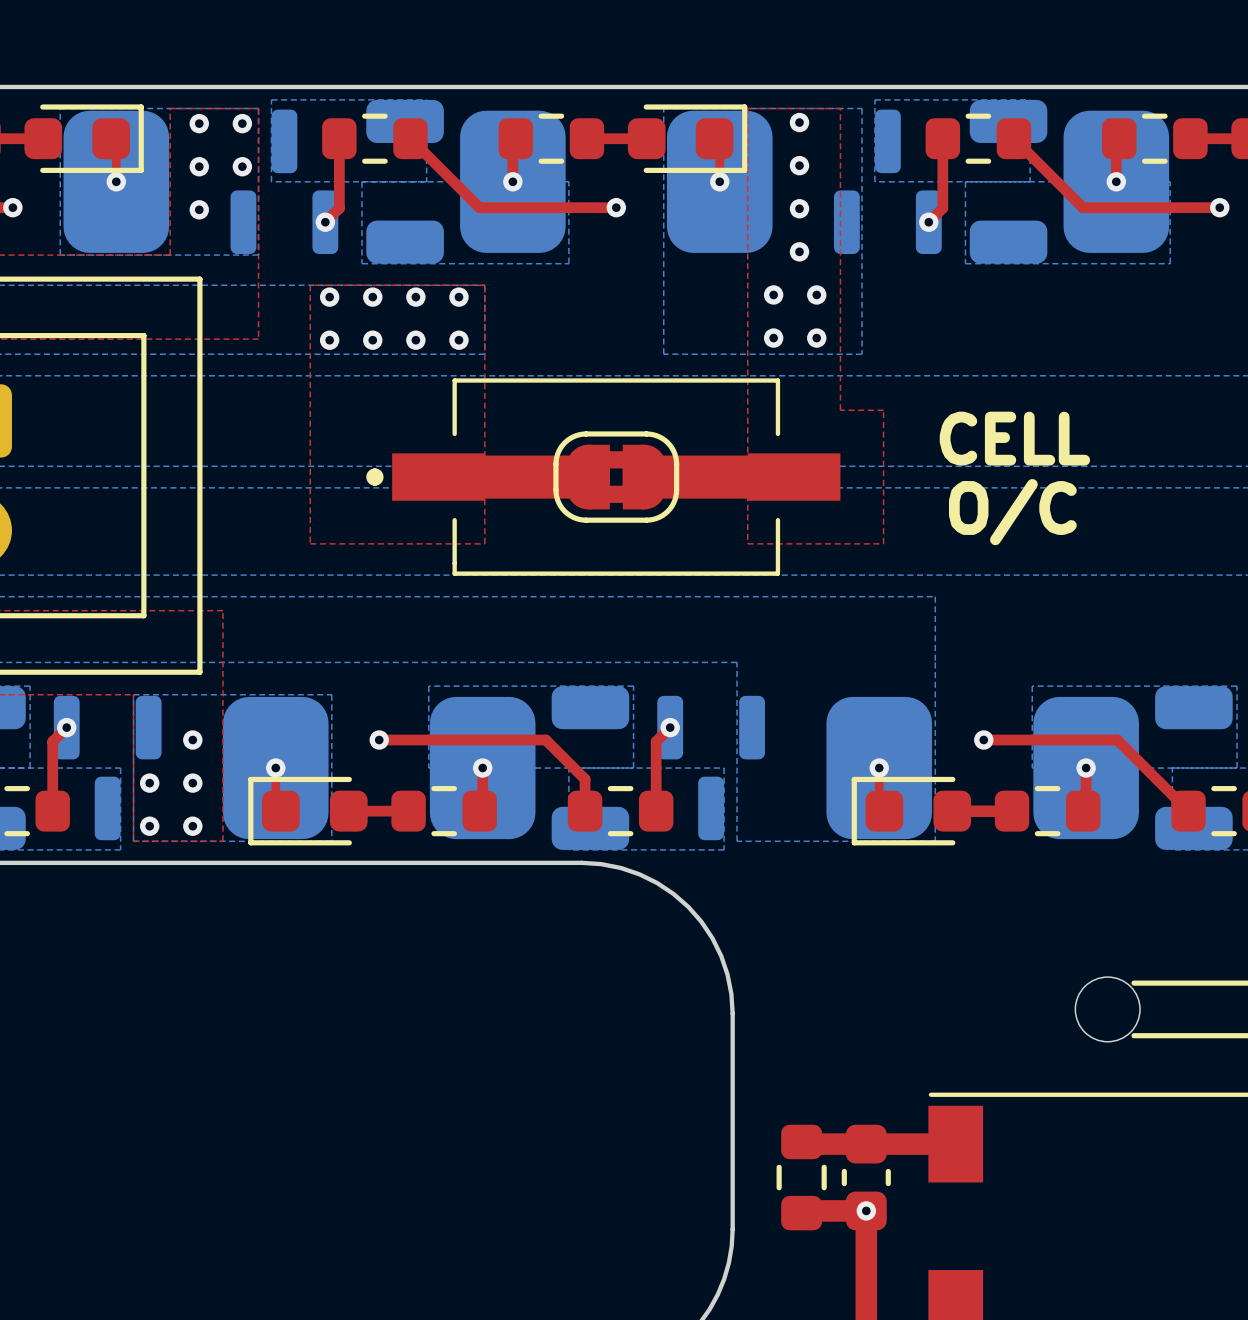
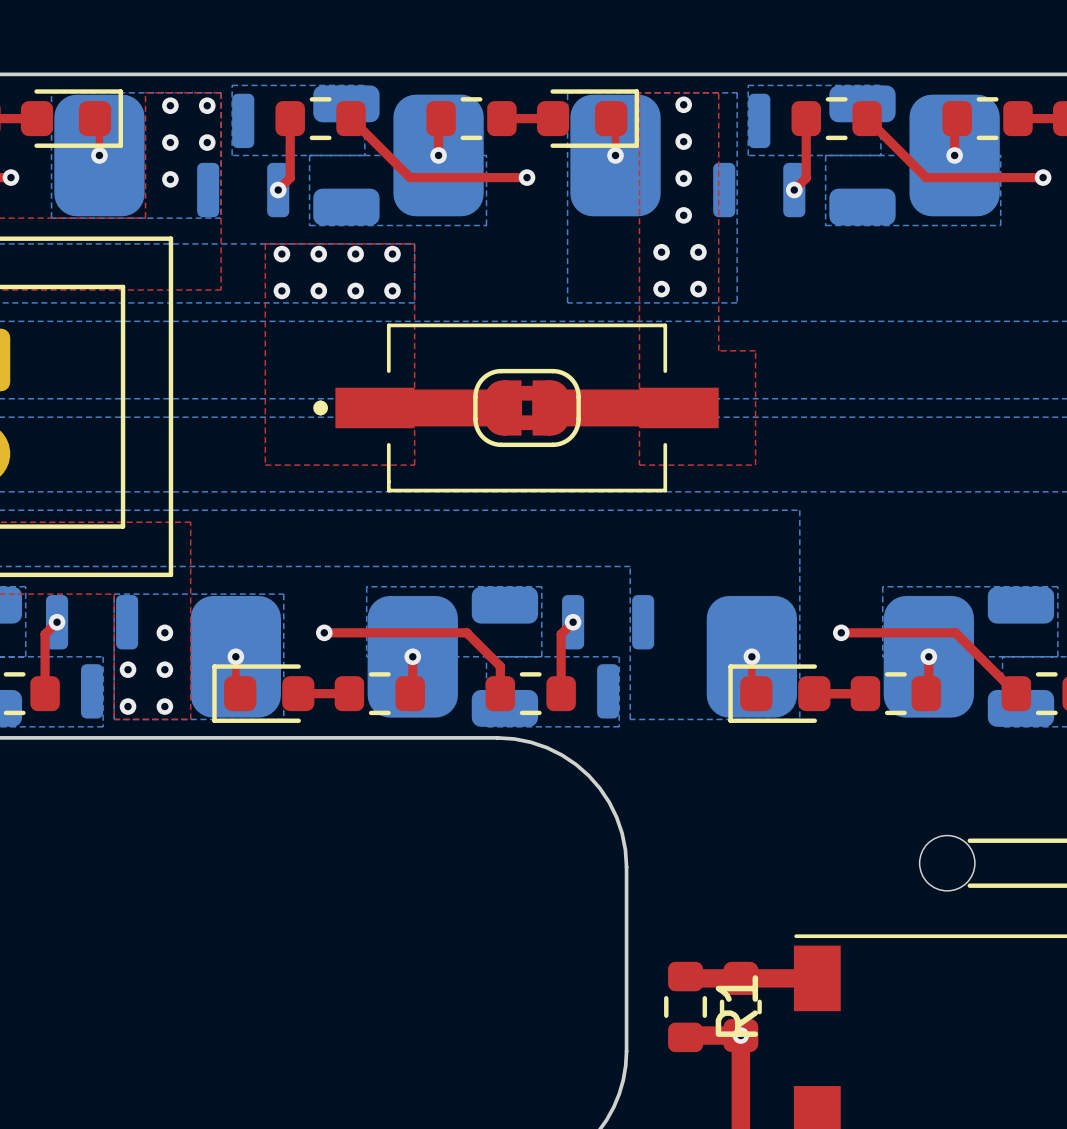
text: CELL (1014, 438) -> none
text: O/C (1012, 512) -> none
R1 name: none -> R1 (736, 1006)

